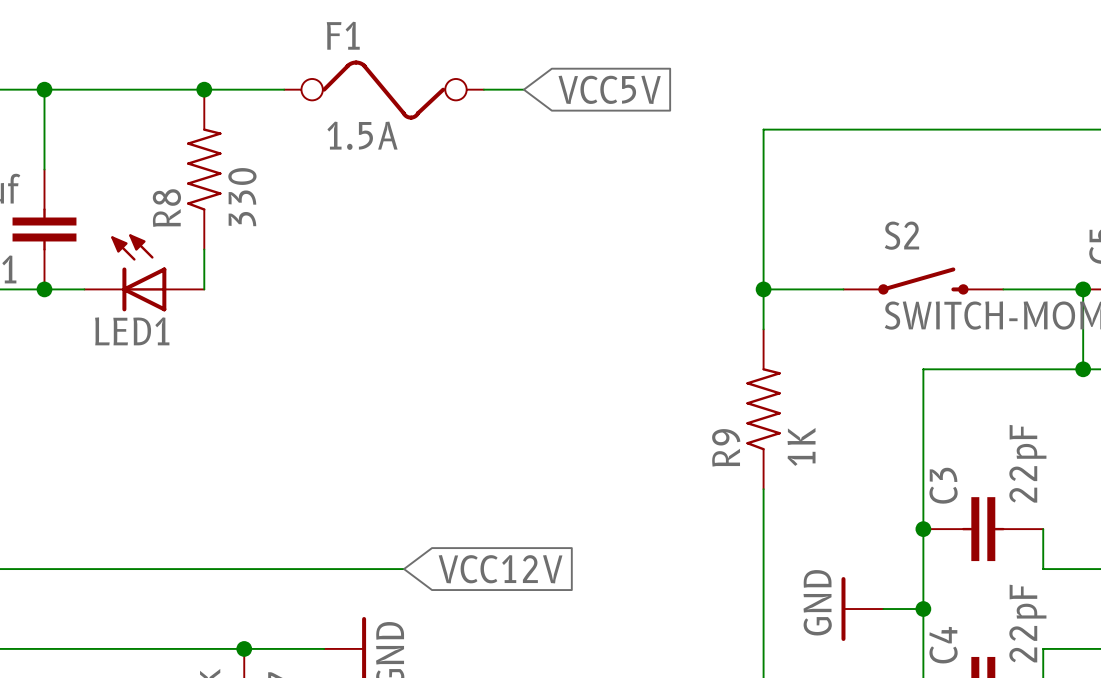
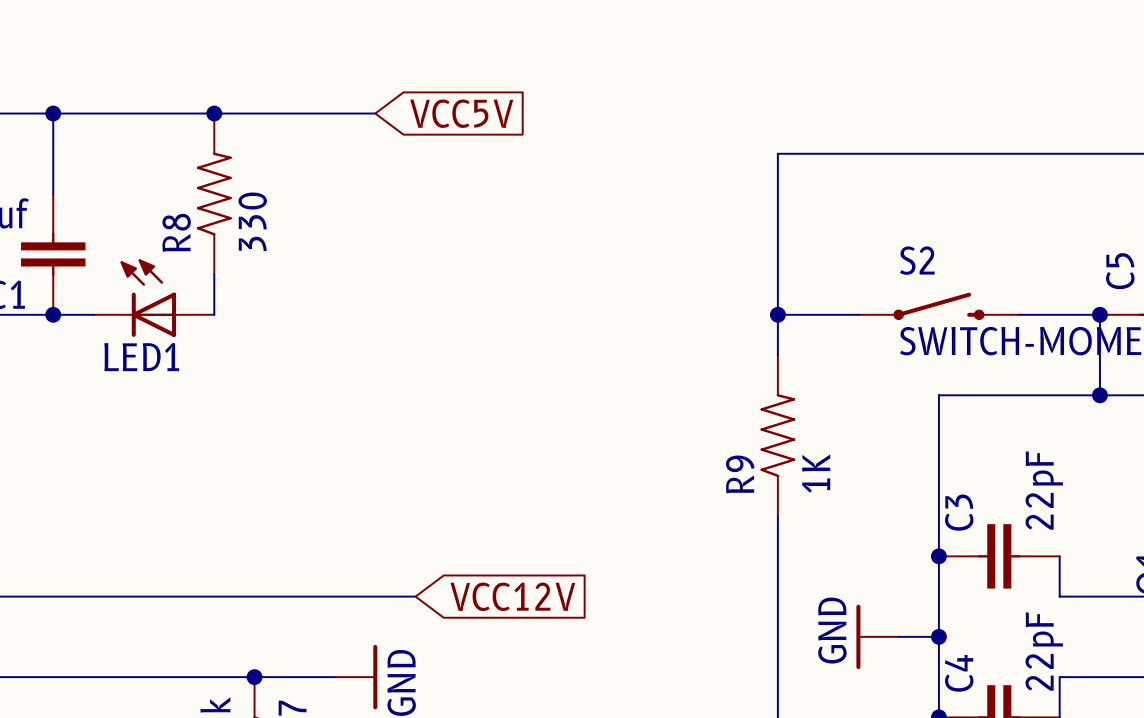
wire: none -> (294, 113) (375, 113)
wire: (483, 89) (523, 89) -> none
global label position: VCC5V (609, 89) -> VCC5V (461, 113)
F1: 1.5A (384, 90) -> none

